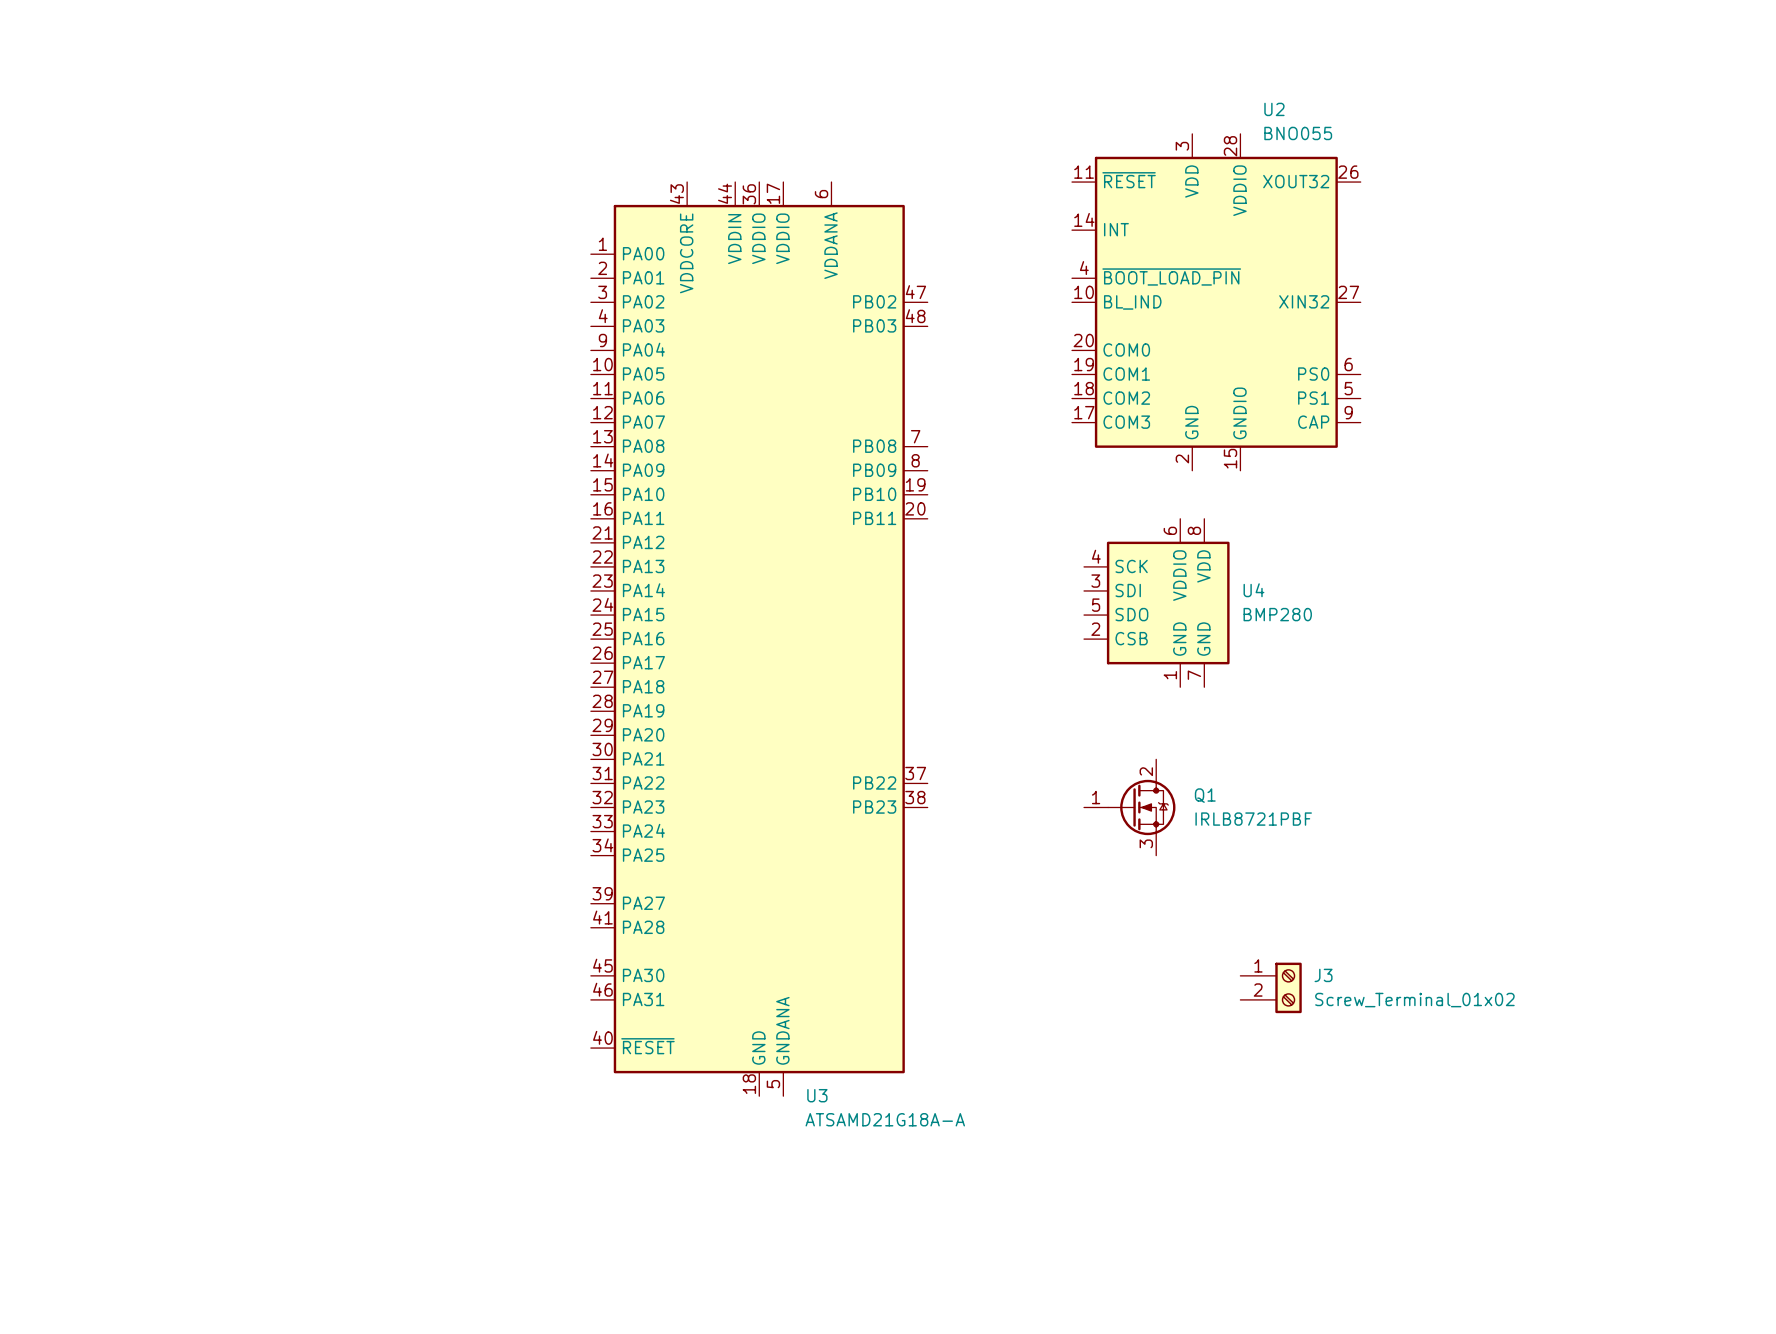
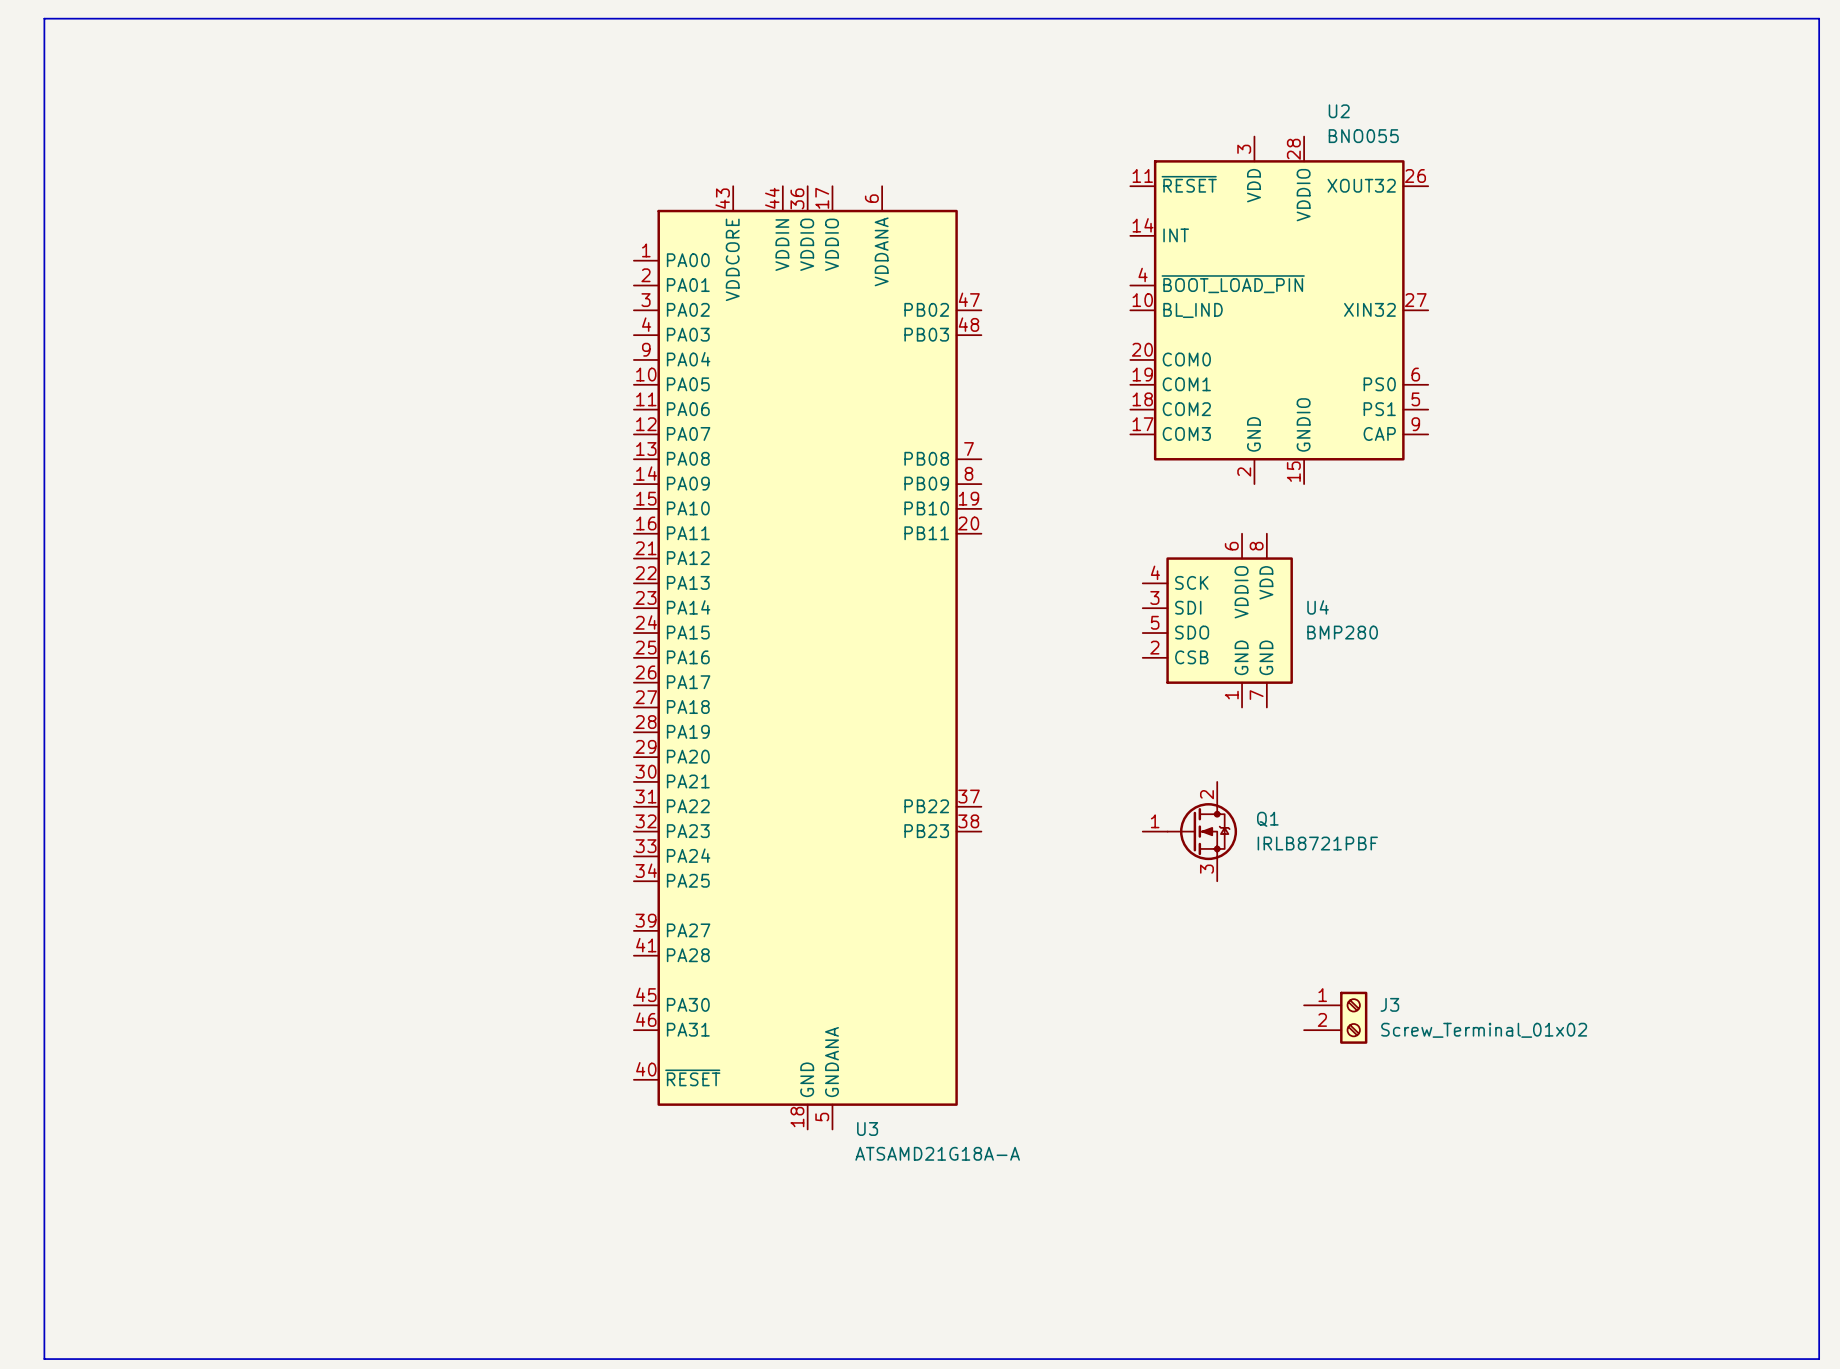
line: none -> (44, 18) (1819, 18) (1819, 1359) (44, 1359) (44, 18)

